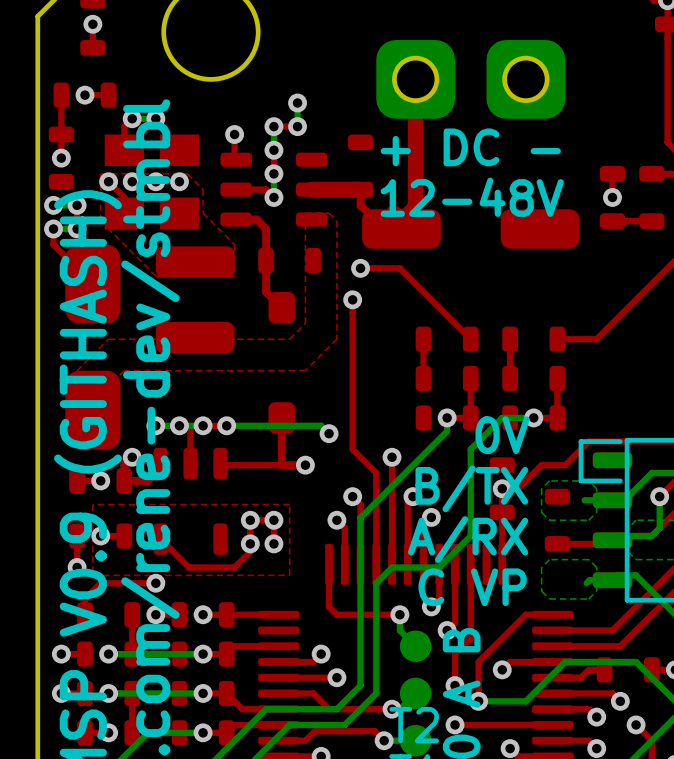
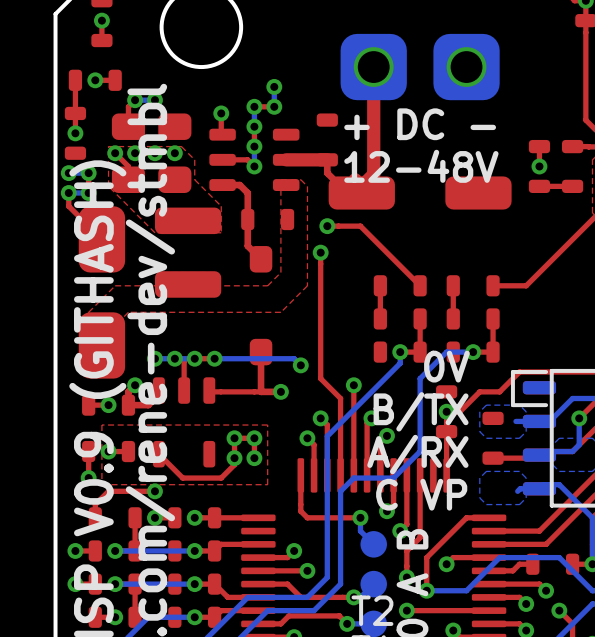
part footprint: [104, 134, 145, 229] -> [111, 113, 146, 193]
part footprint: [159, 134, 200, 229] -> [158, 113, 192, 193]

